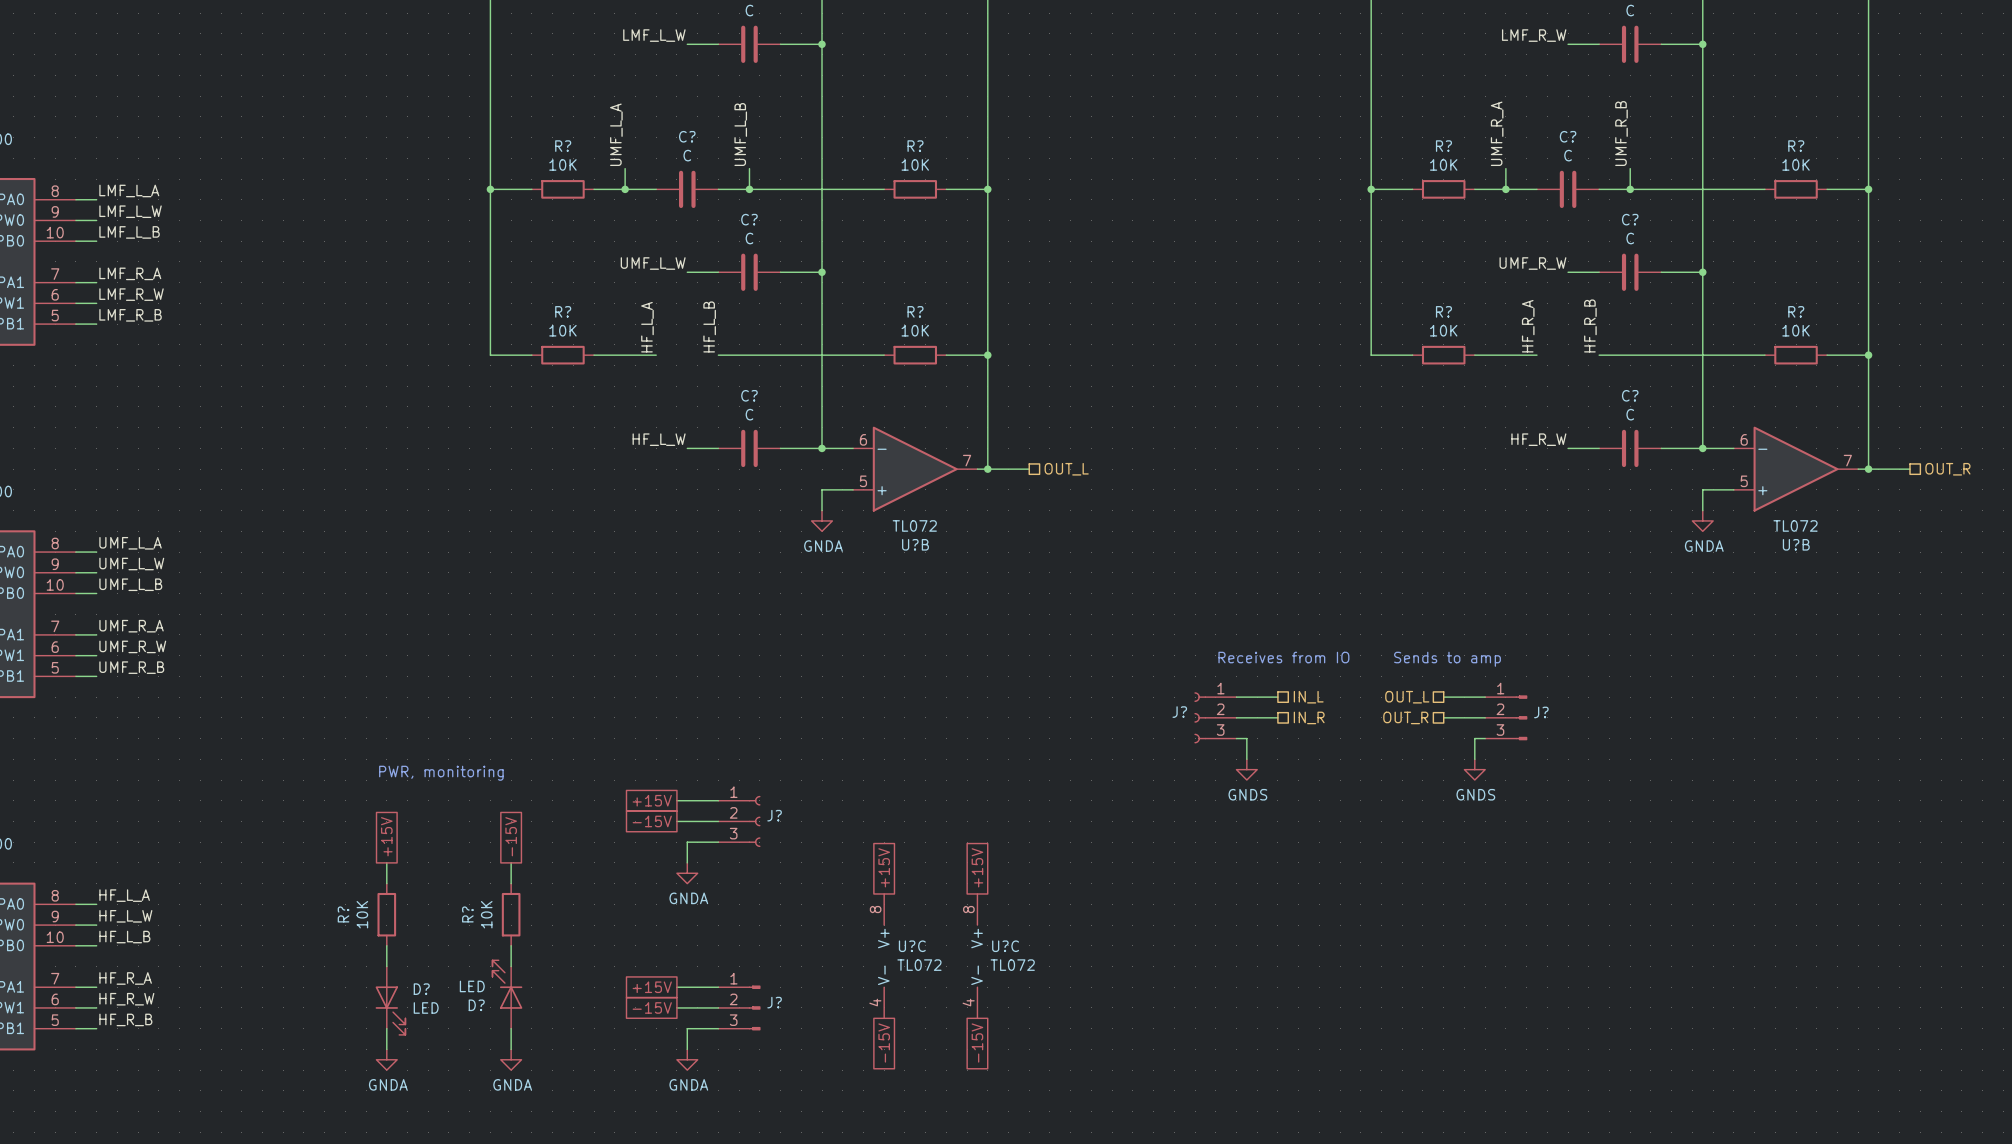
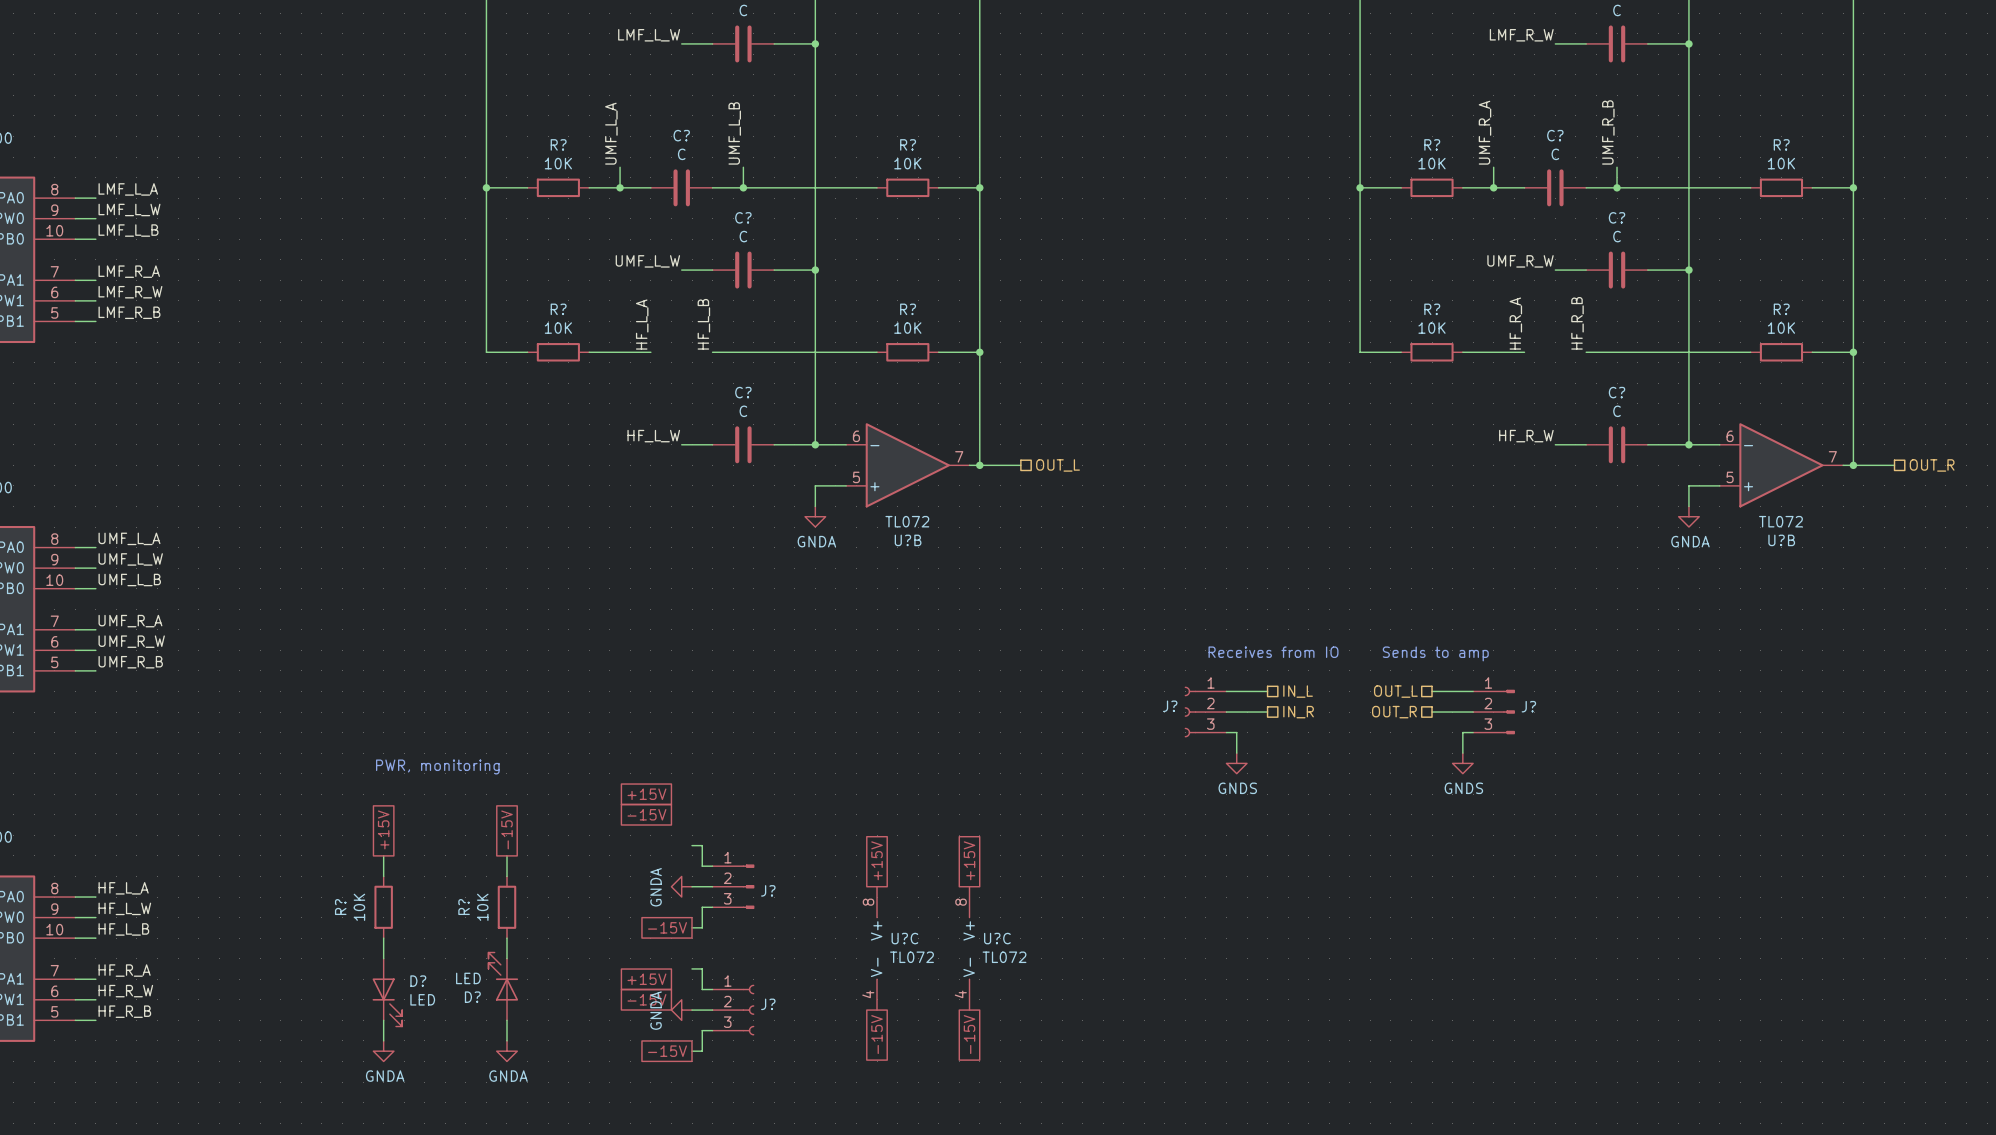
wire: (676, 800) (718, 800) -> none
wire: (676, 821) (718, 821) -> none
J? position: (739, 821) -> (733, 1010)
wire: (718, 842) (687, 842) (687, 862) -> none
wire: none -> (692, 845) (702, 845) (702, 866) (712, 866)
power symbol rotation: 0° (687, 873) -> 90° clockwise (681, 886)
power symbol position: GNDA (687, 873) -> GNDA (681, 886)
wire: none -> (692, 886) (712, 886)
wire: none -> (712, 907) (702, 907) (702, 927) (692, 927)
global label: none -> -15V (667, 927)
wire: none -> (692, 968) (702, 968) (702, 989) (712, 989)
wire: (676, 987) (718, 987) -> none
J? name position: J? (774, 1002) -> J? (768, 890)
wire: (676, 1007) (718, 1007) -> none
J? position: (739, 1007) -> (733, 886)
wire: none -> (692, 1010) (712, 1010)
wire: (718, 1028) (687, 1028) (687, 1049) -> none
wire: none -> (712, 1030) (702, 1030) (702, 1051) (692, 1051)
global label: none -> -15V (667, 1051)
power symbol rotation: 0° (687, 1059) -> 90° clockwise (681, 1010)
power symbol position: GNDA (687, 1059) -> GNDA (681, 1010)

